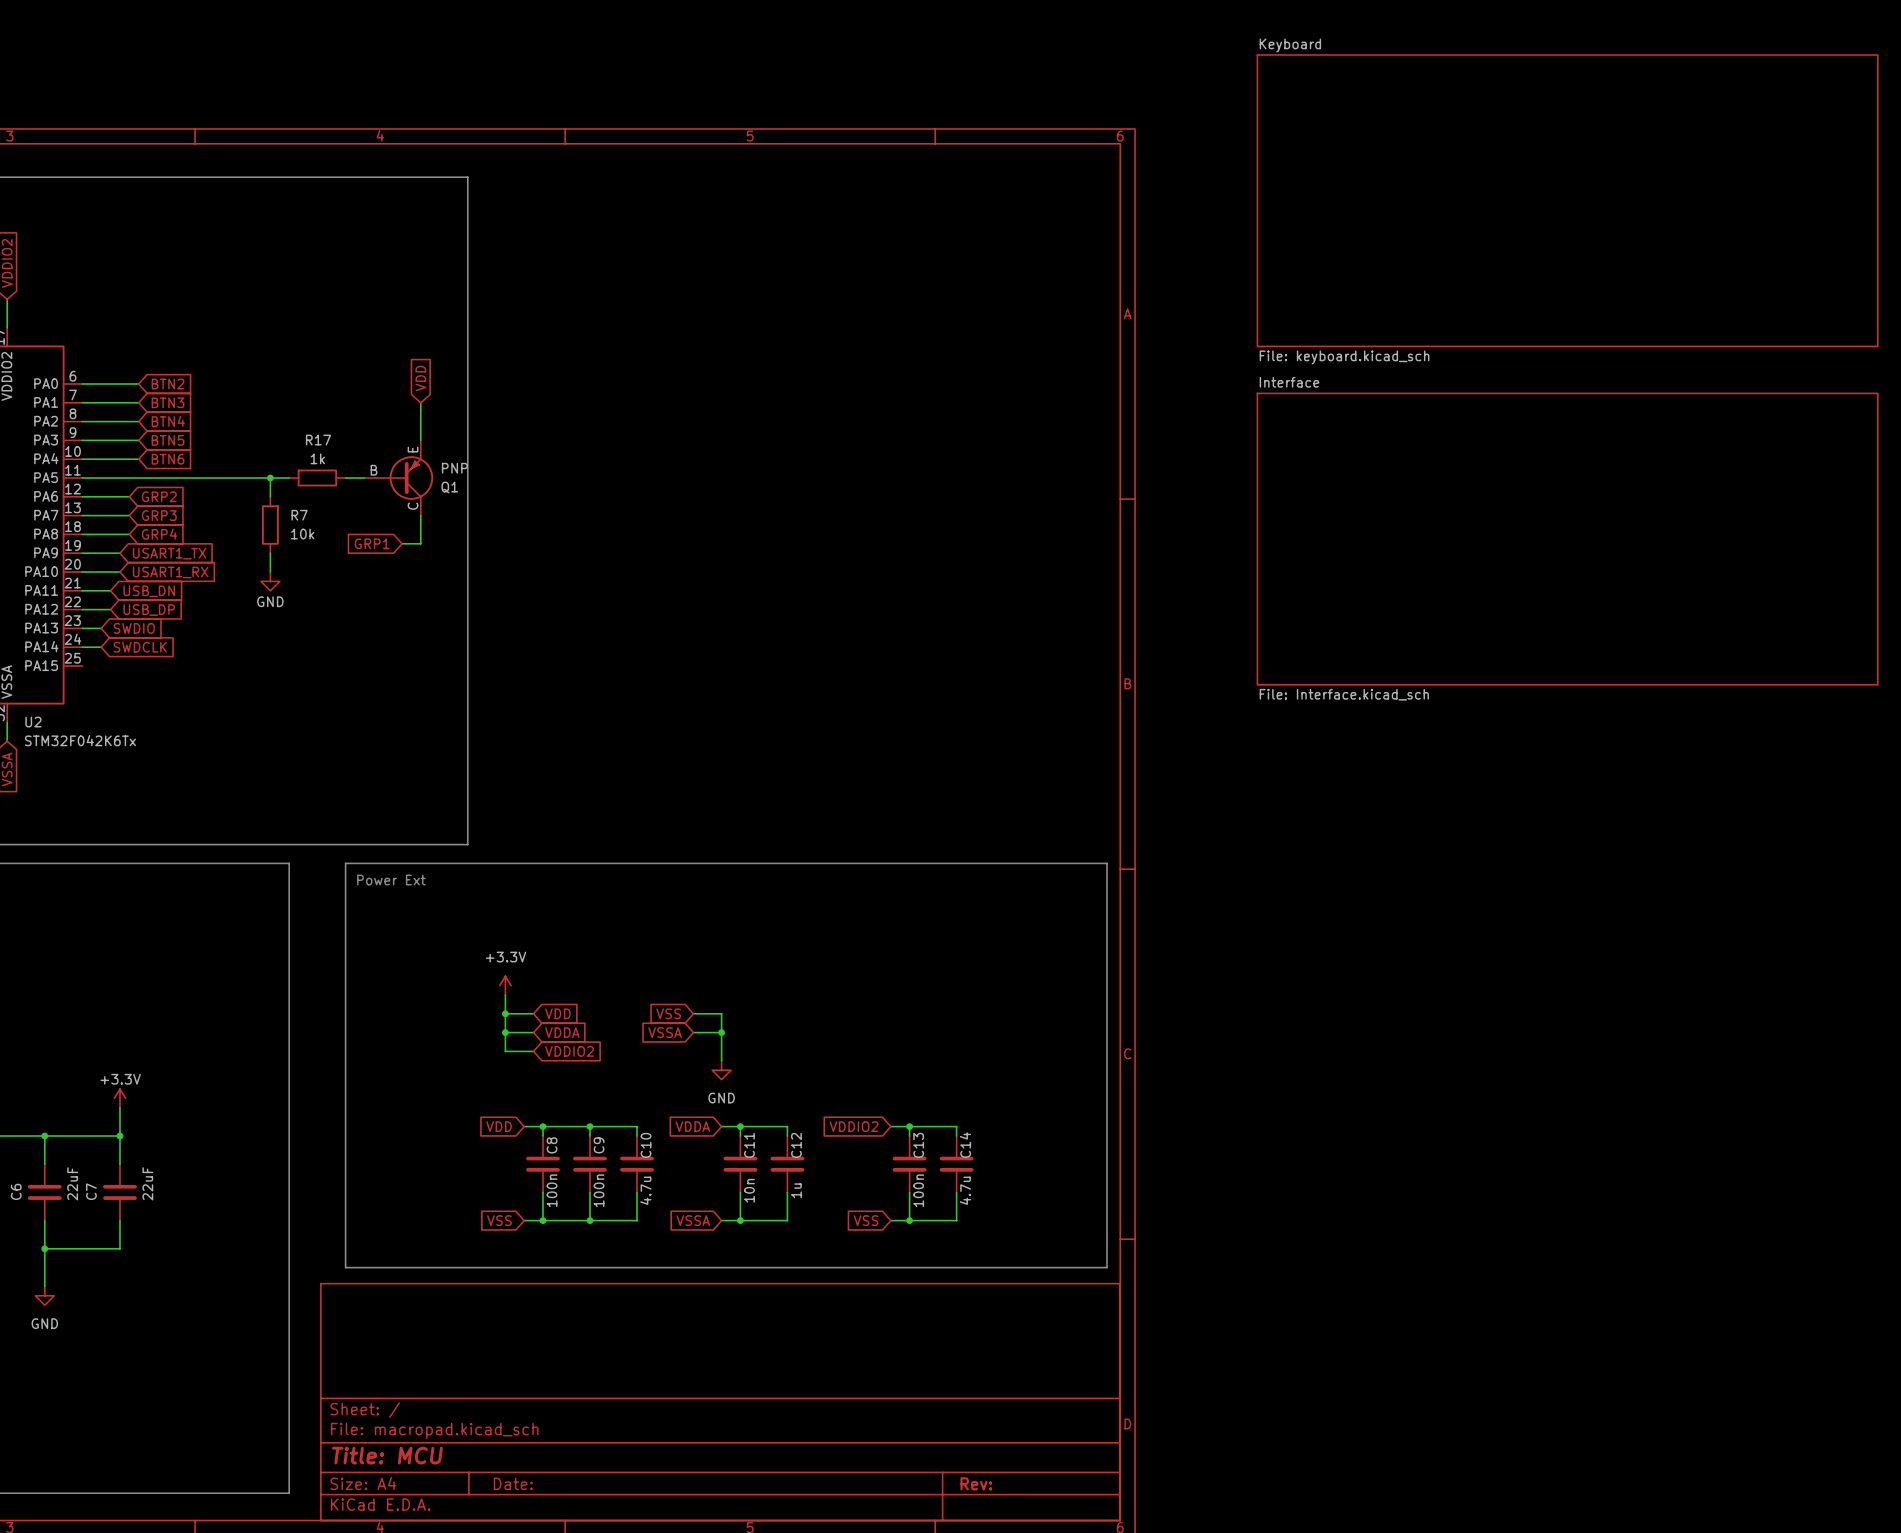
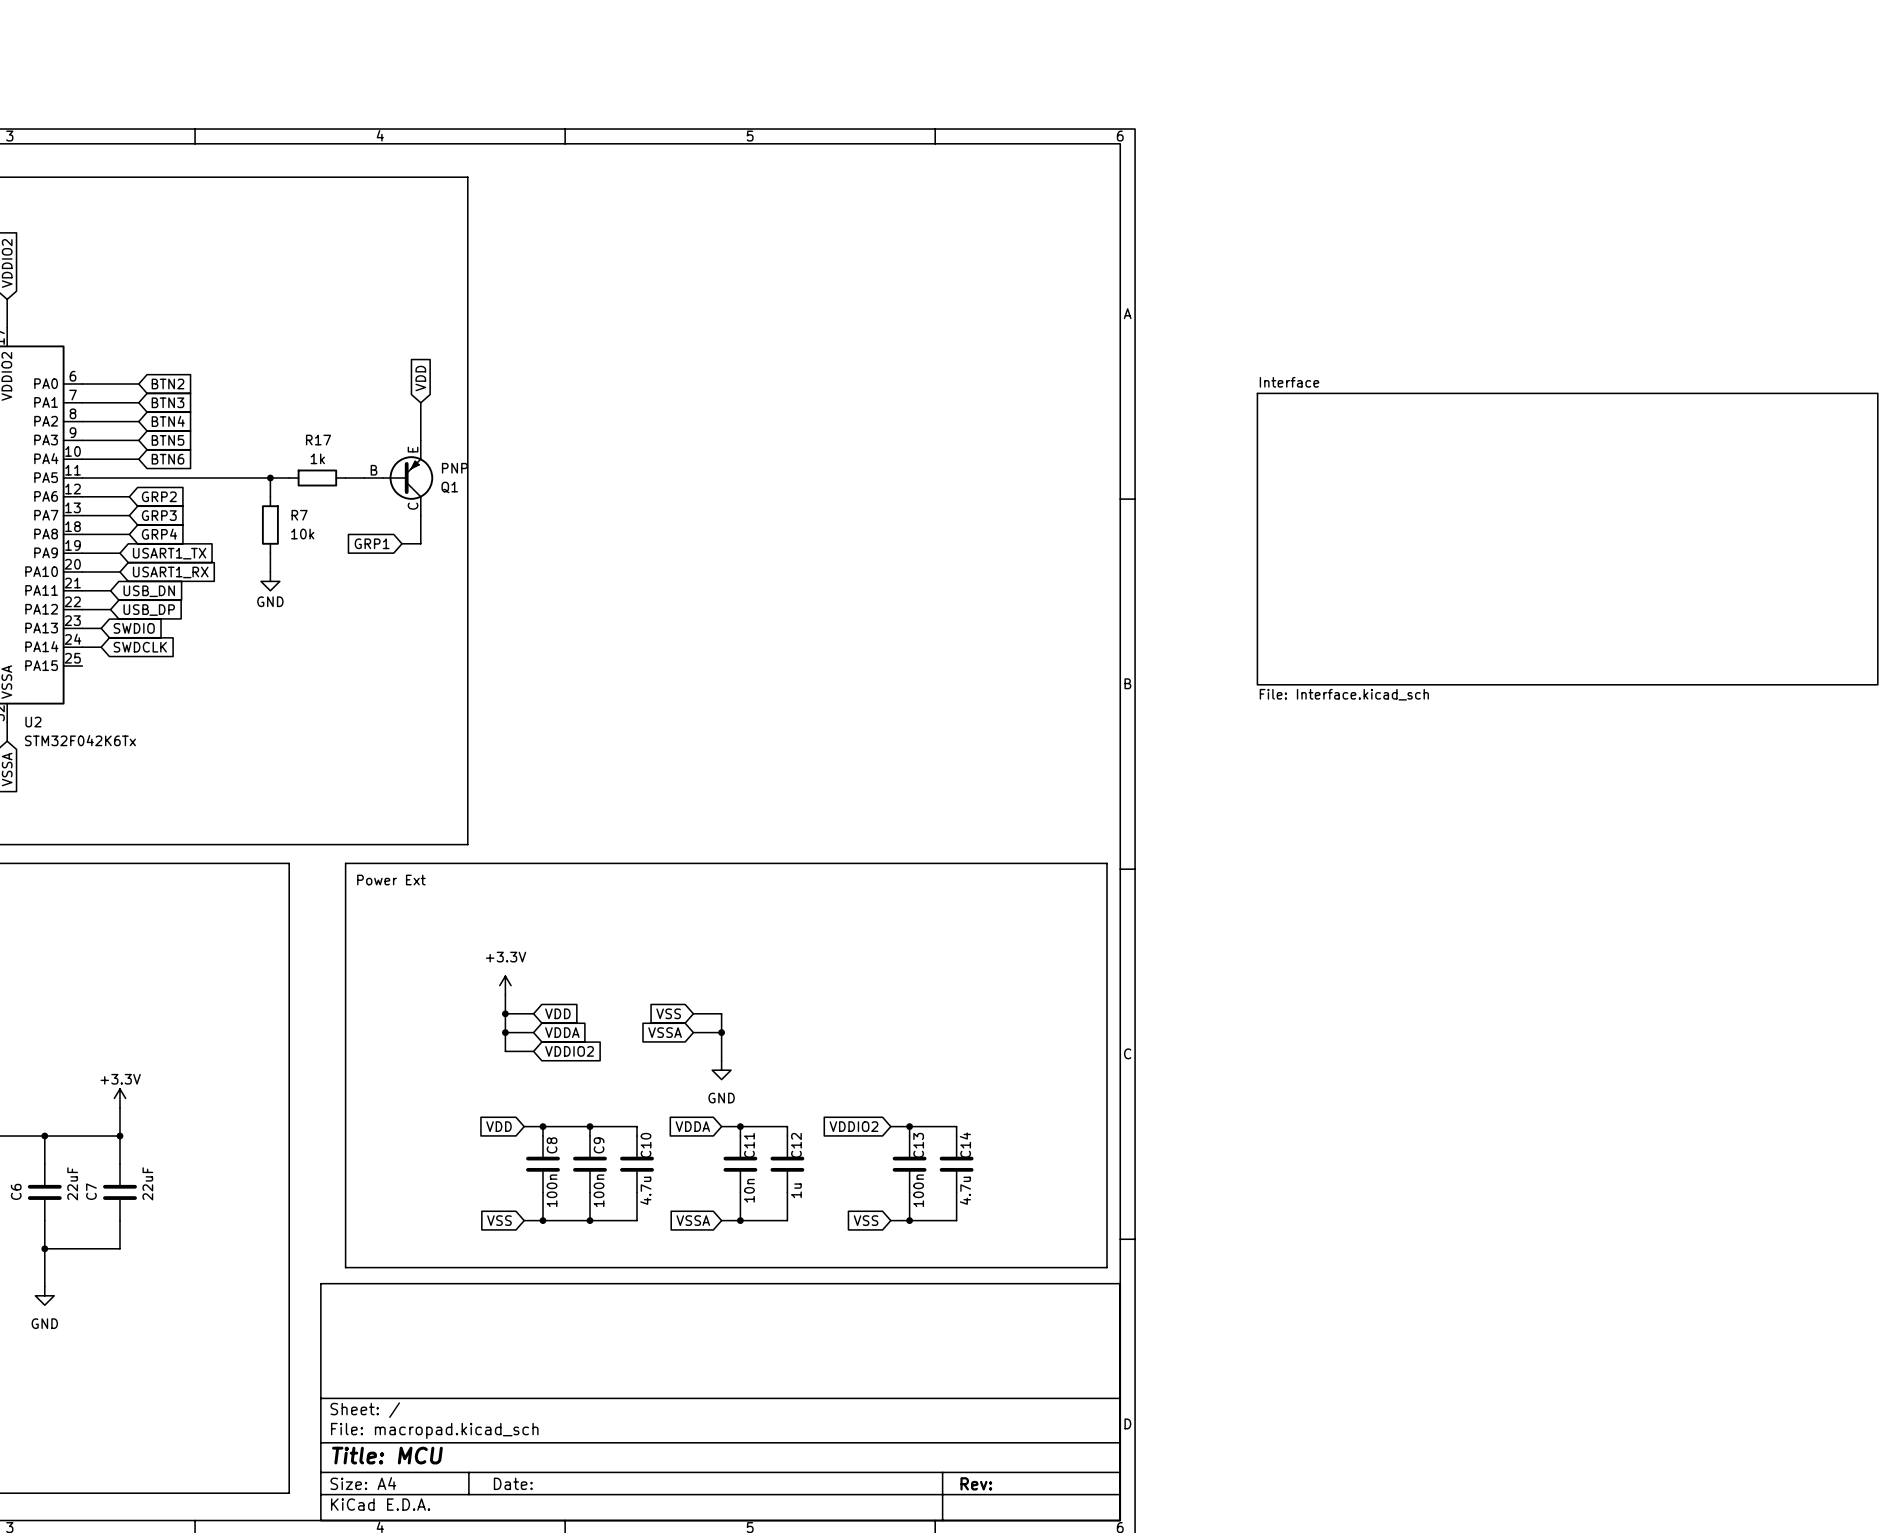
sheet Keyboard: File: keyboard.kicad_sch (1567, 200) -> none

